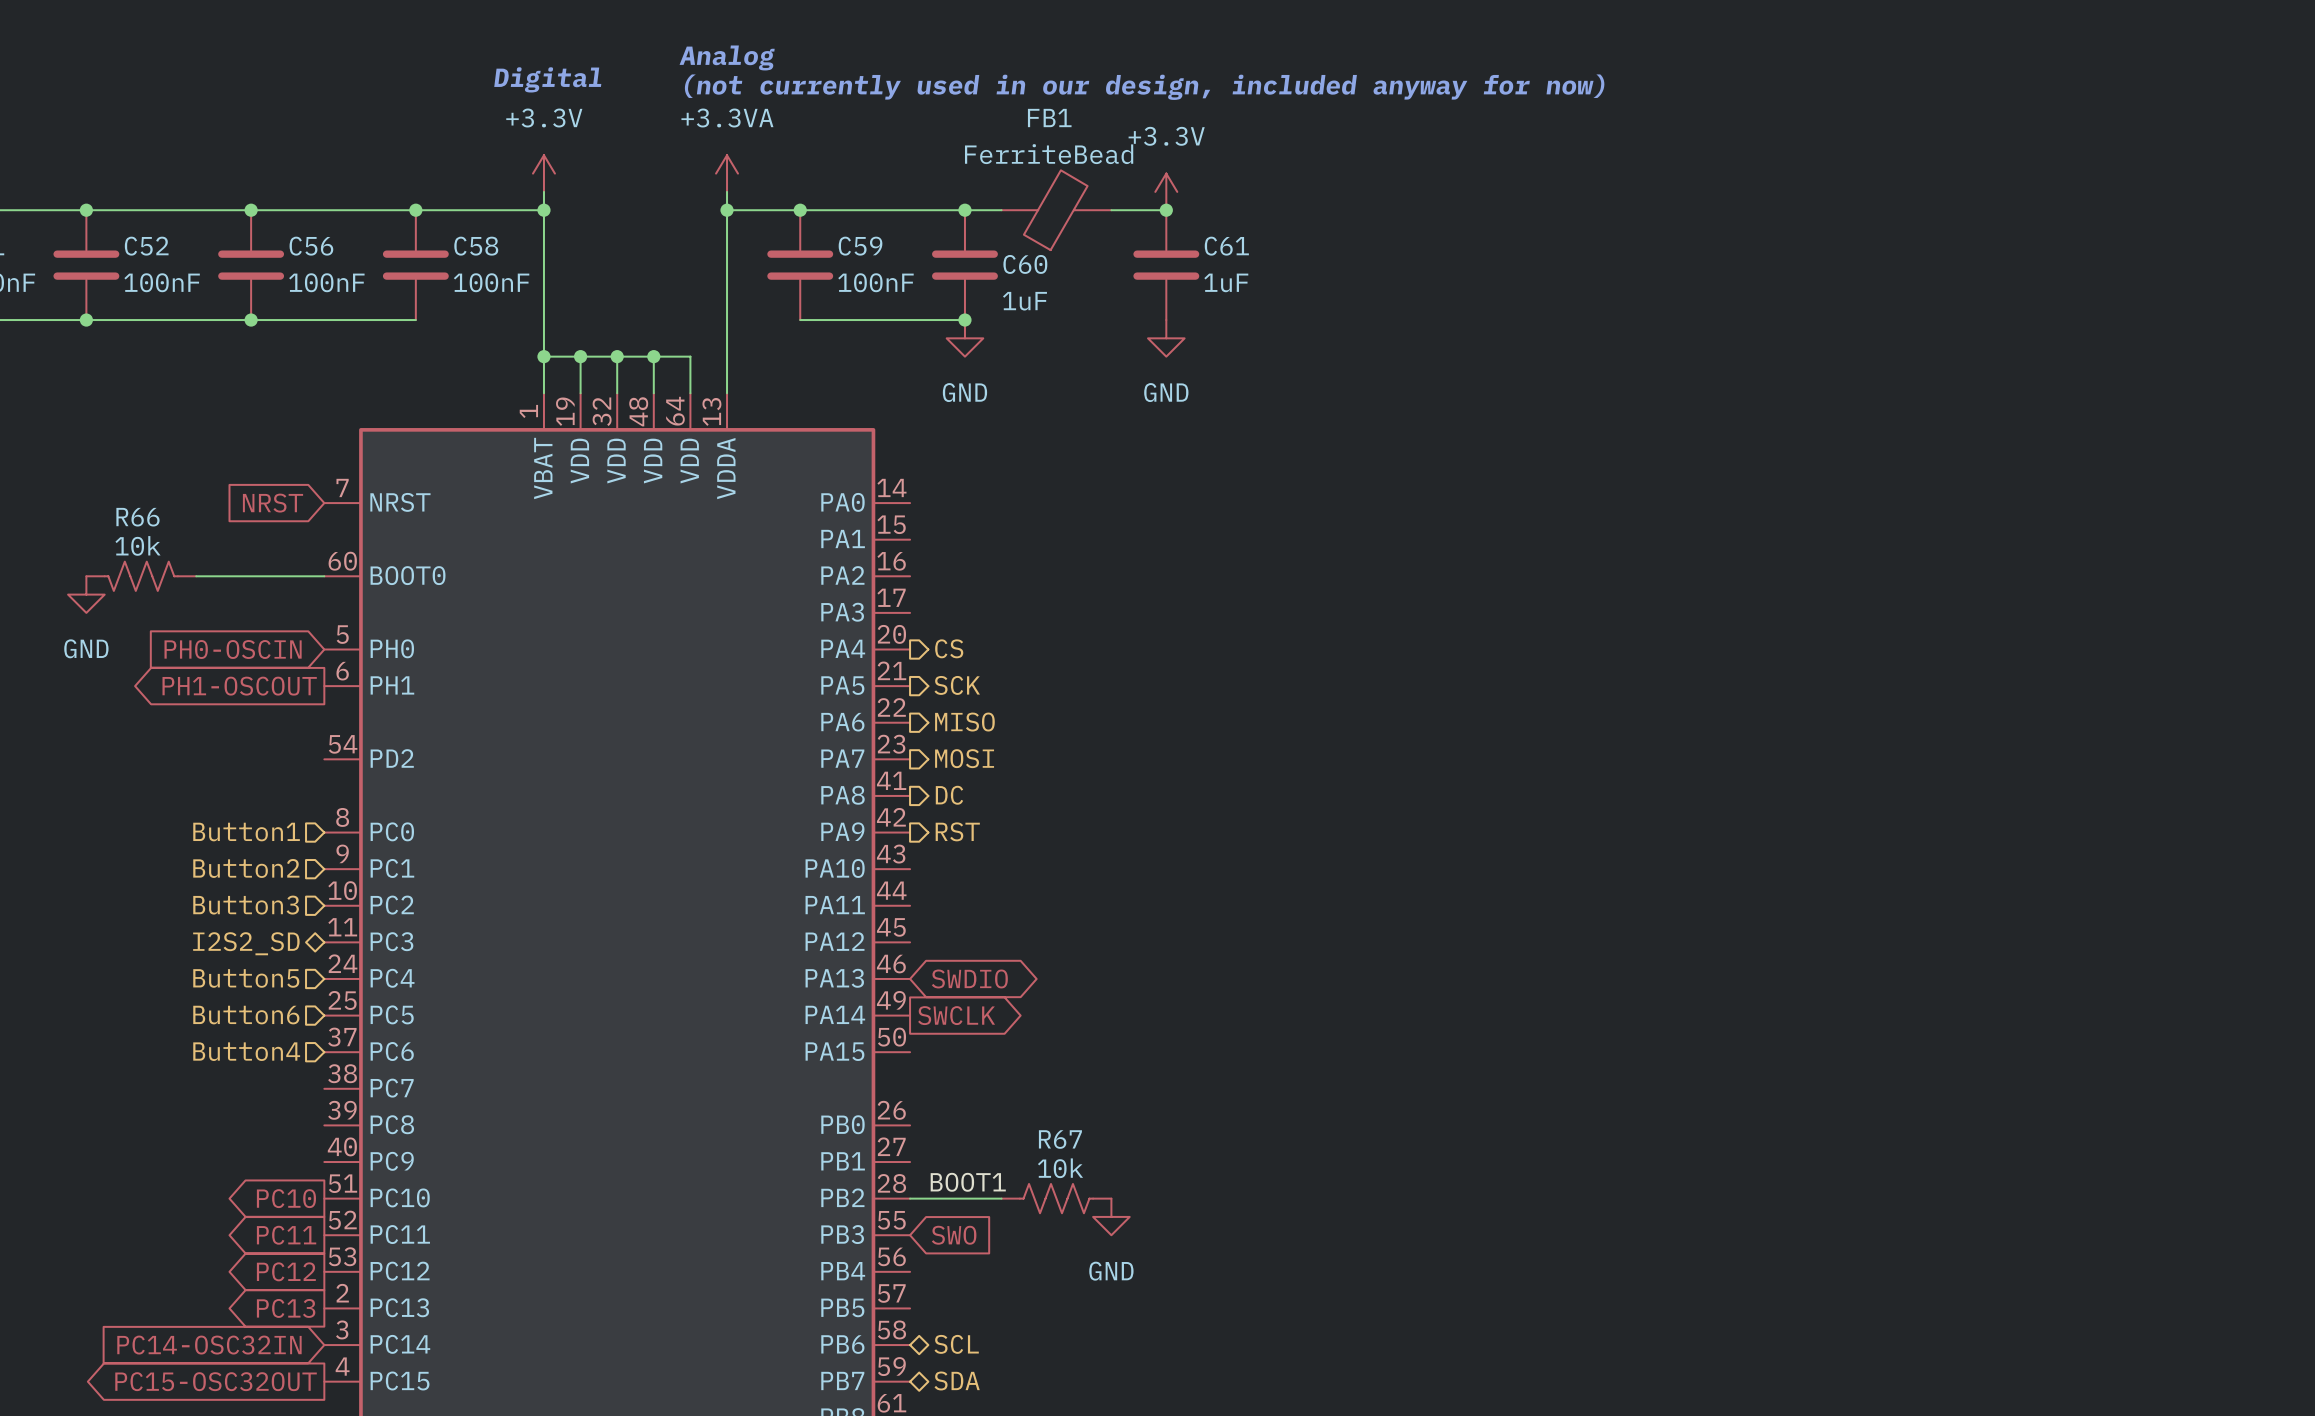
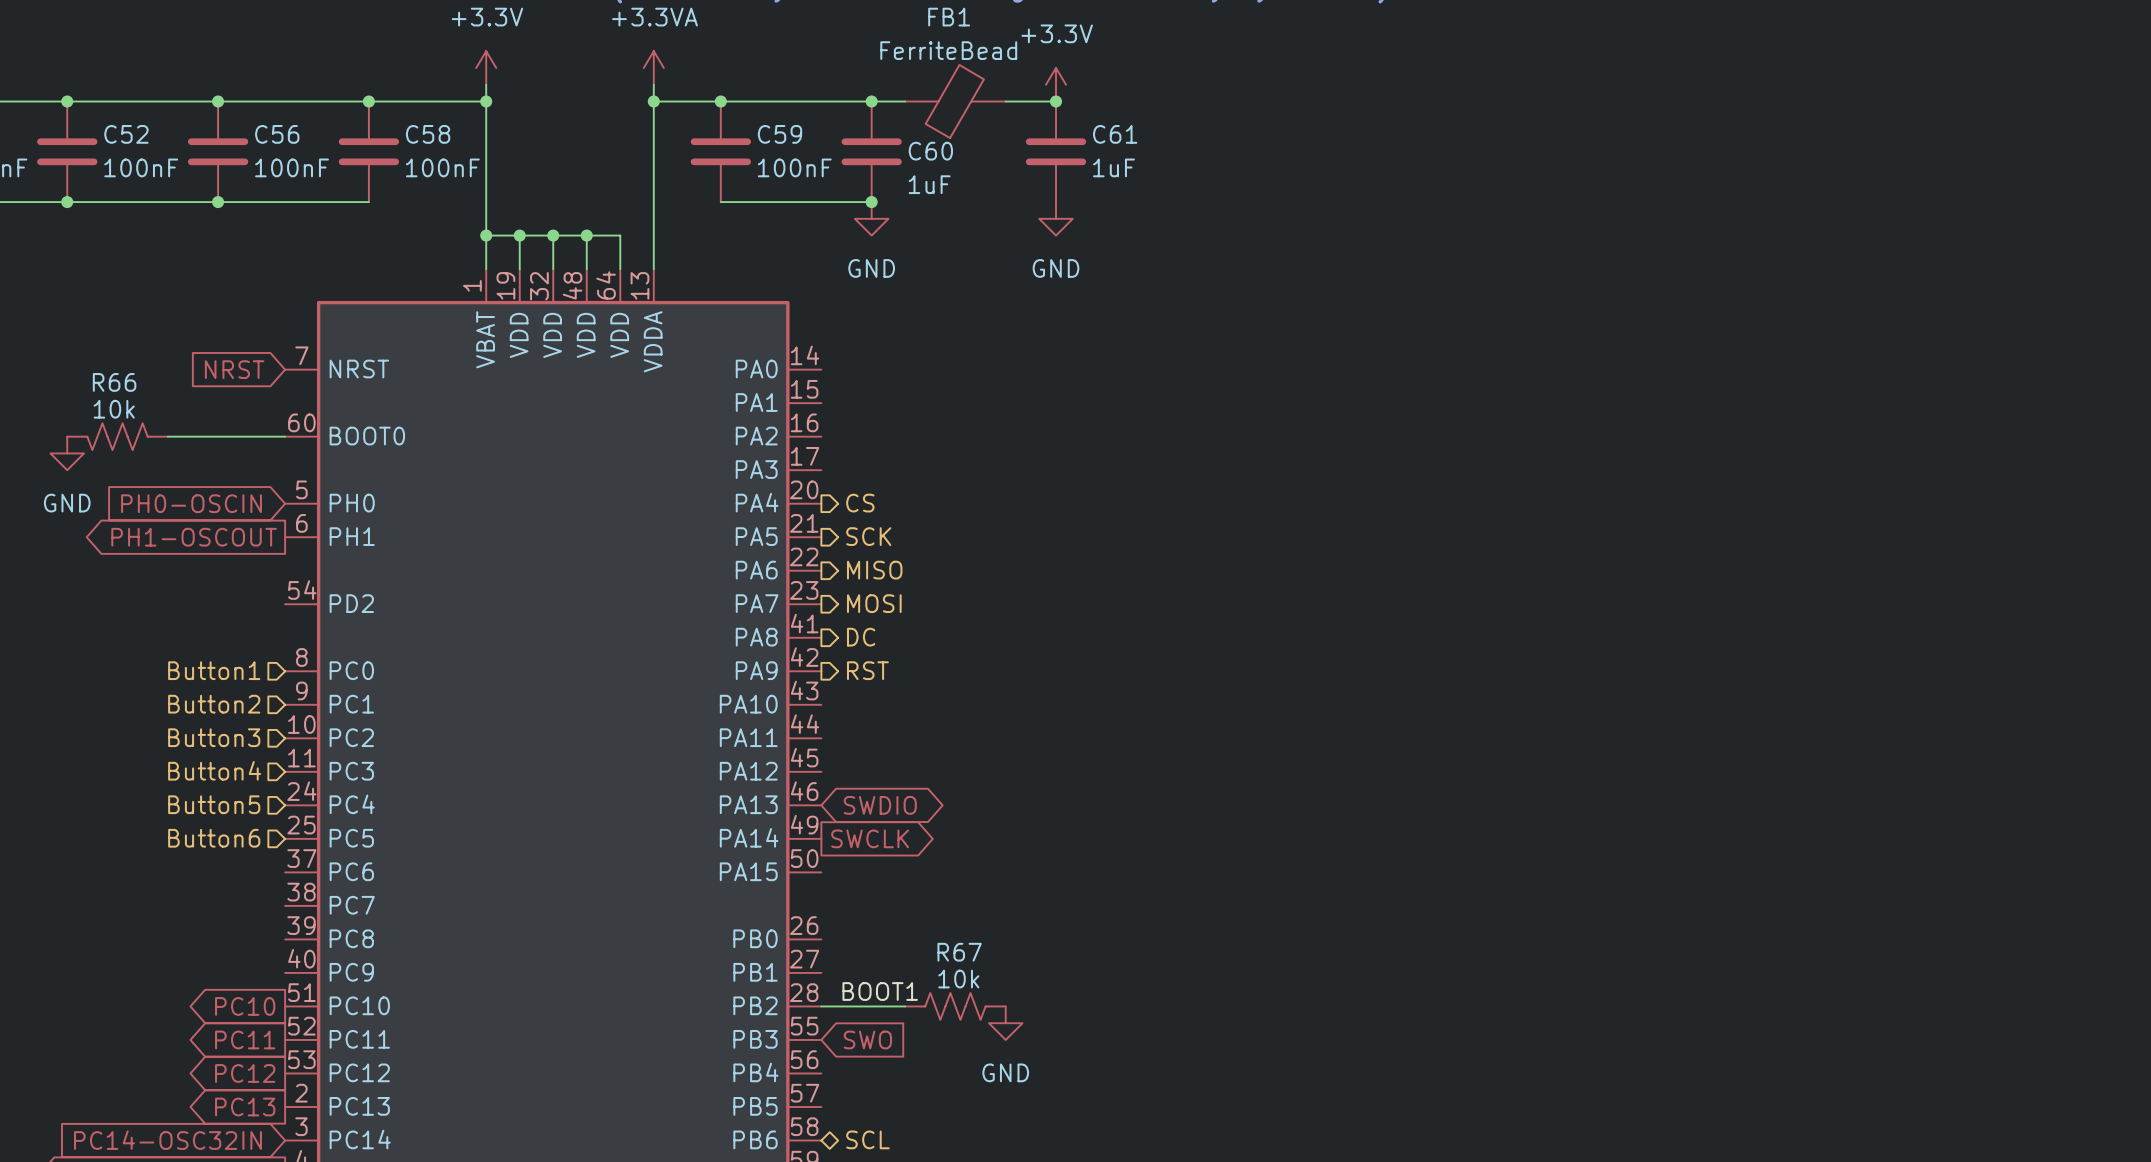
hierarchical label shape: bidirectional (246, 943) -> input (214, 770)
hierarchical label: I2S2_SD (246, 943) -> Button4 (214, 770)
hierarchical label: Button4 (246, 1051) -> none

